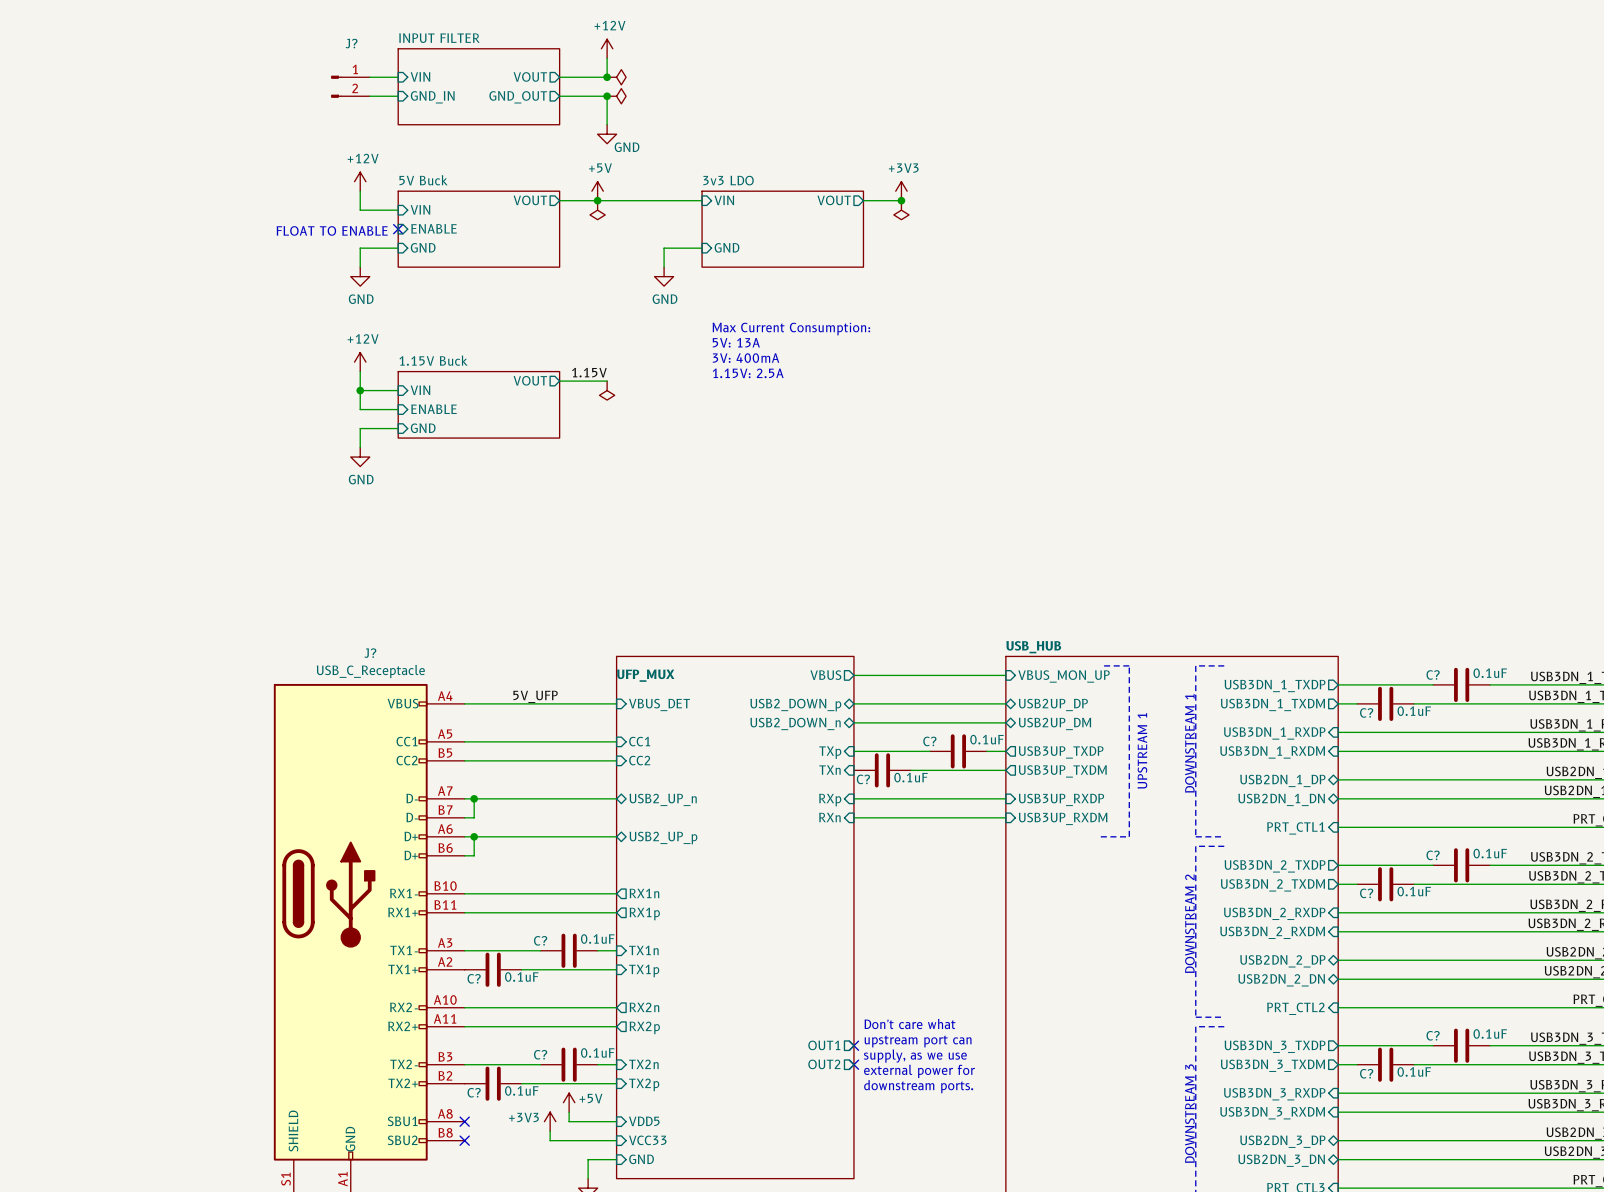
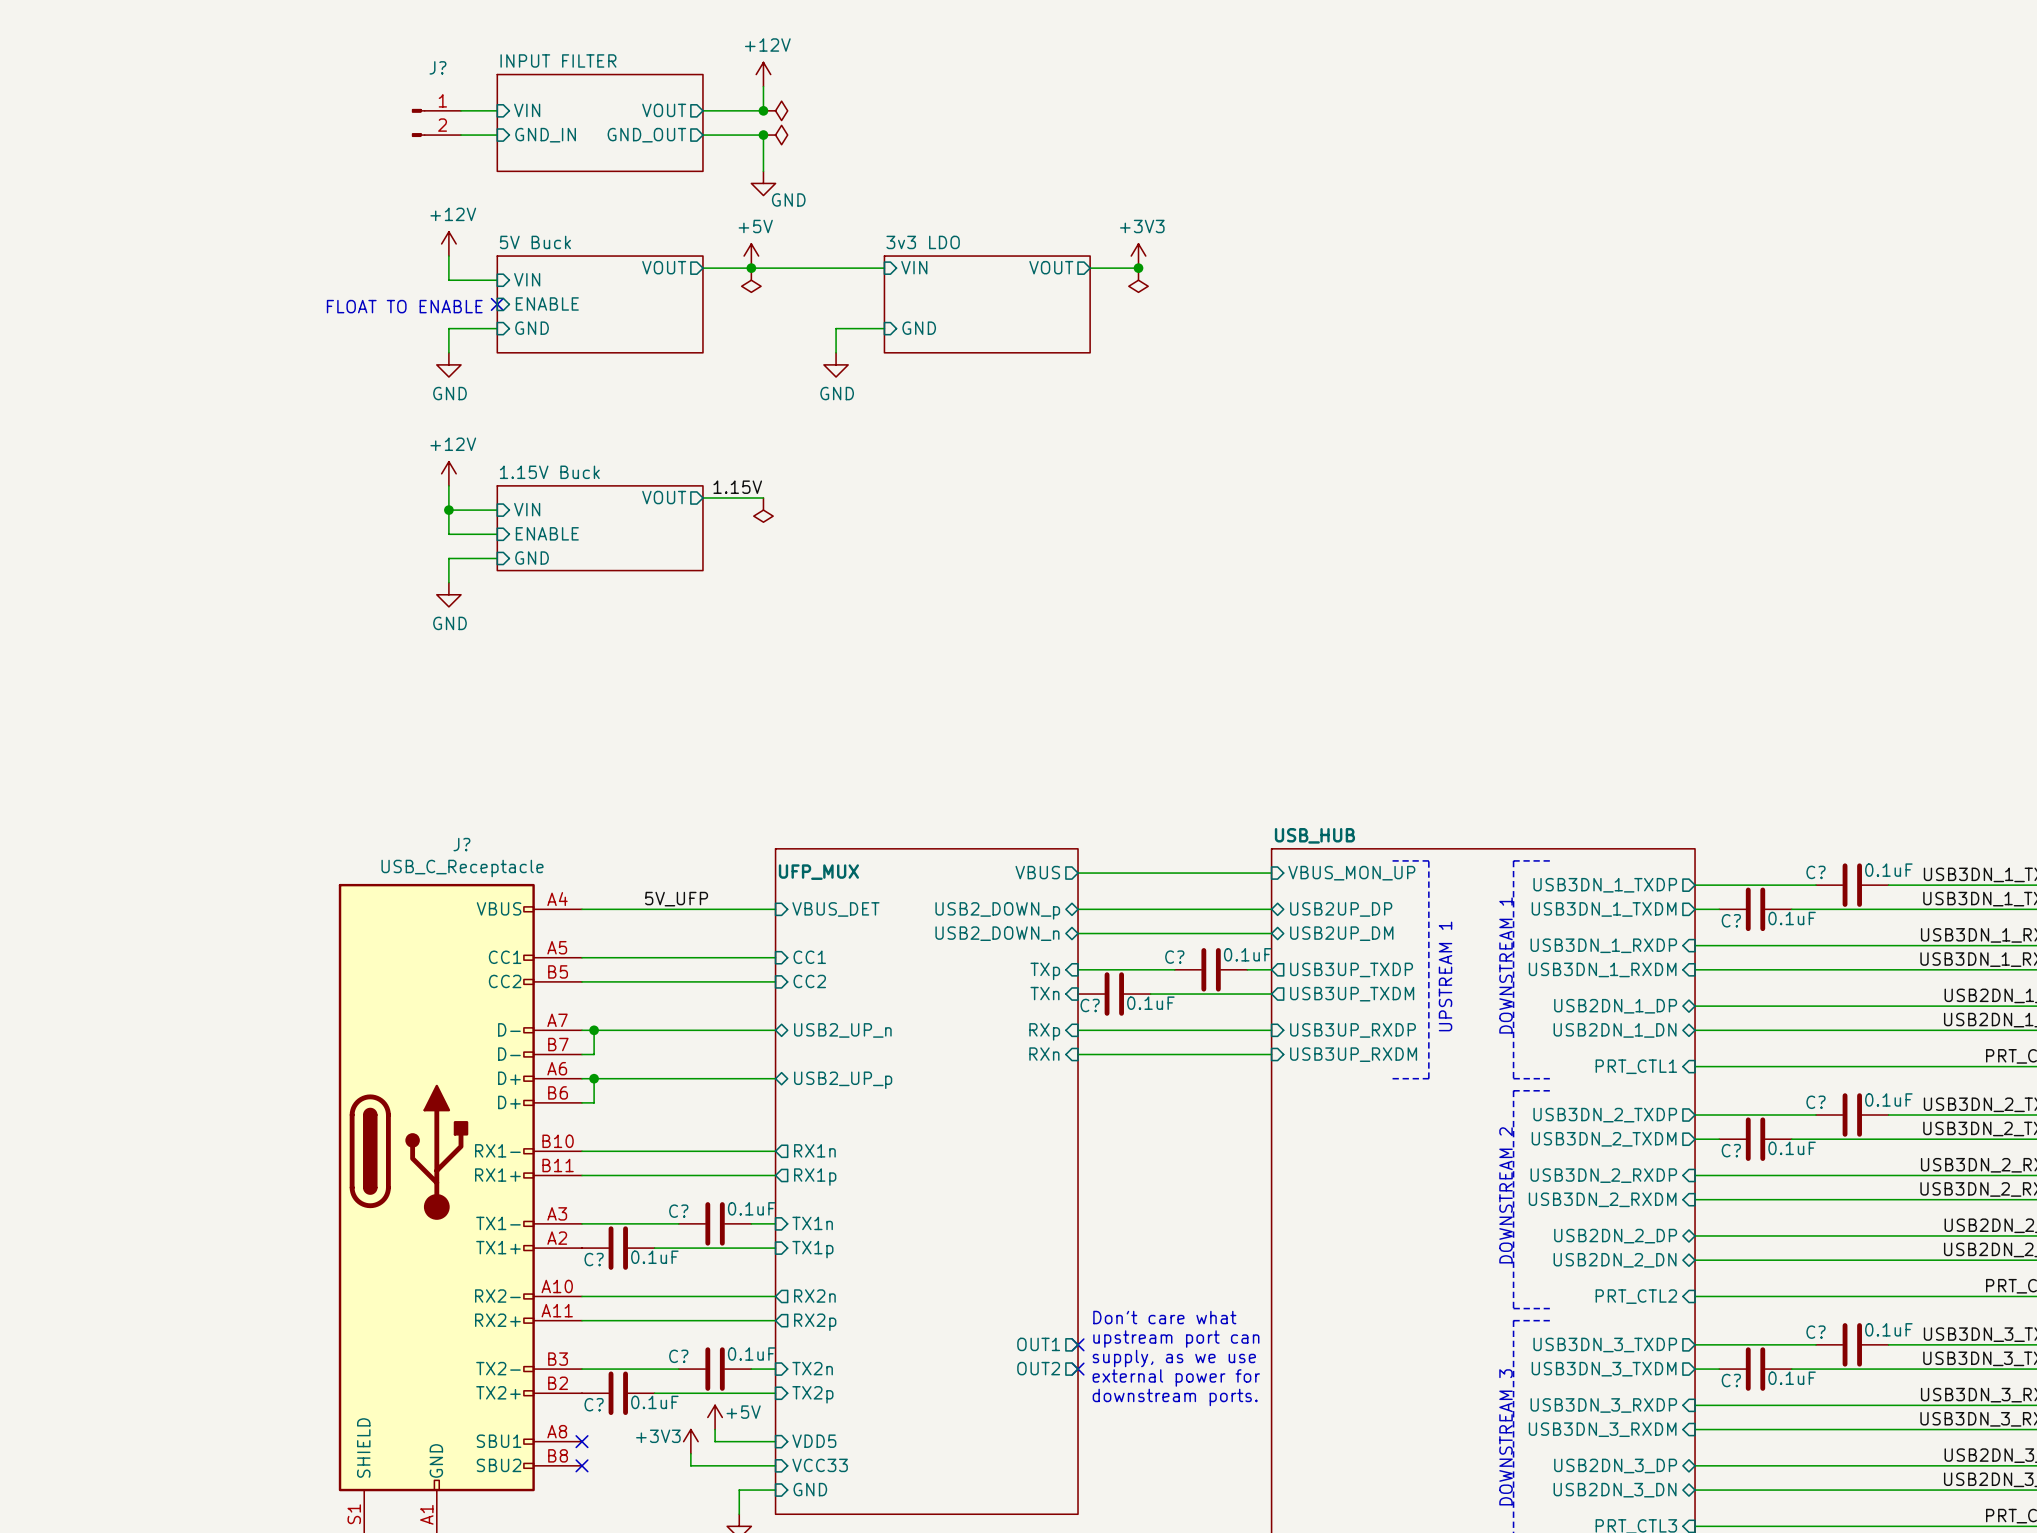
text: Max Current Consumption: (791, 329) -> none
text: 5V: 13A (736, 342) -> none
text: 3V: 400mA (746, 358) -> none
text: 1.15V: 2.5A (748, 373) -> none

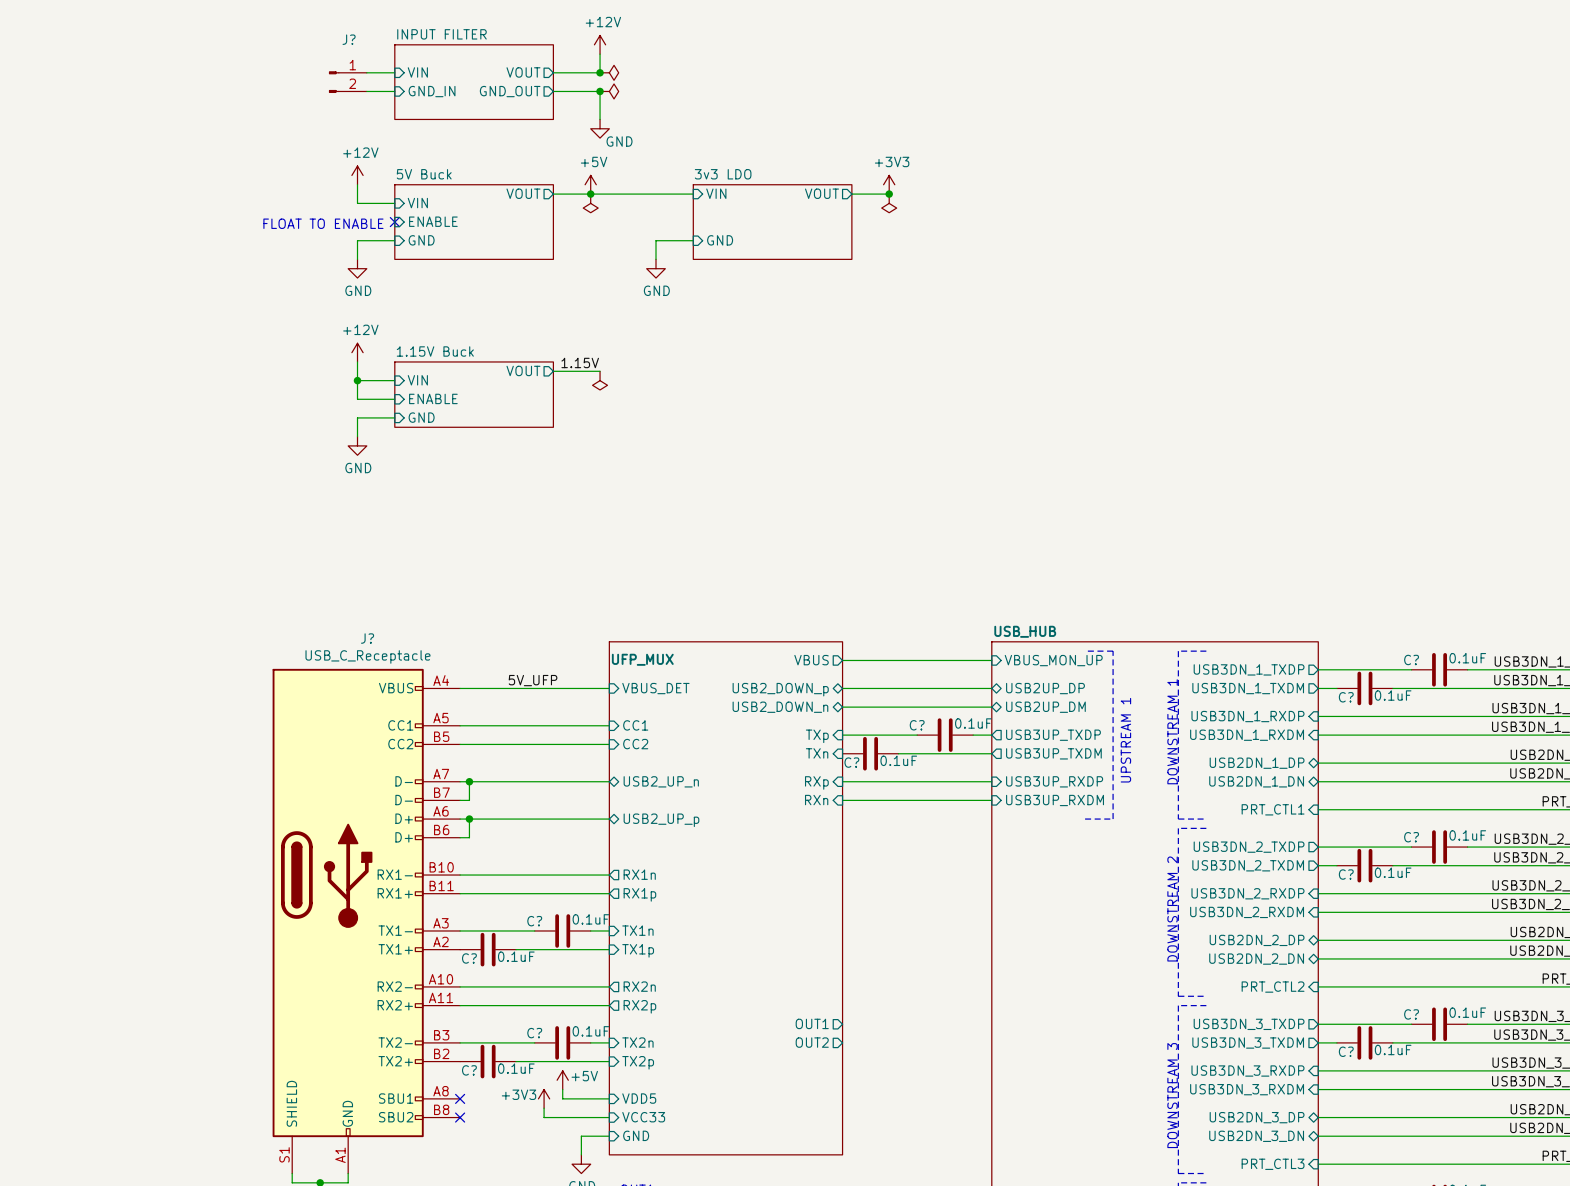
text: Don't care what (1164, 1317) -> none
text: upstream port can (1176, 1339) -> none
no-connect mark: (1078, 1344) -> none
text: supply, as we use (1174, 1358) -> none
no-connect mark: (1078, 1369) -> none
text: external power for (1176, 1377) -> none
text: downstream ports. (1175, 1397) -> none

